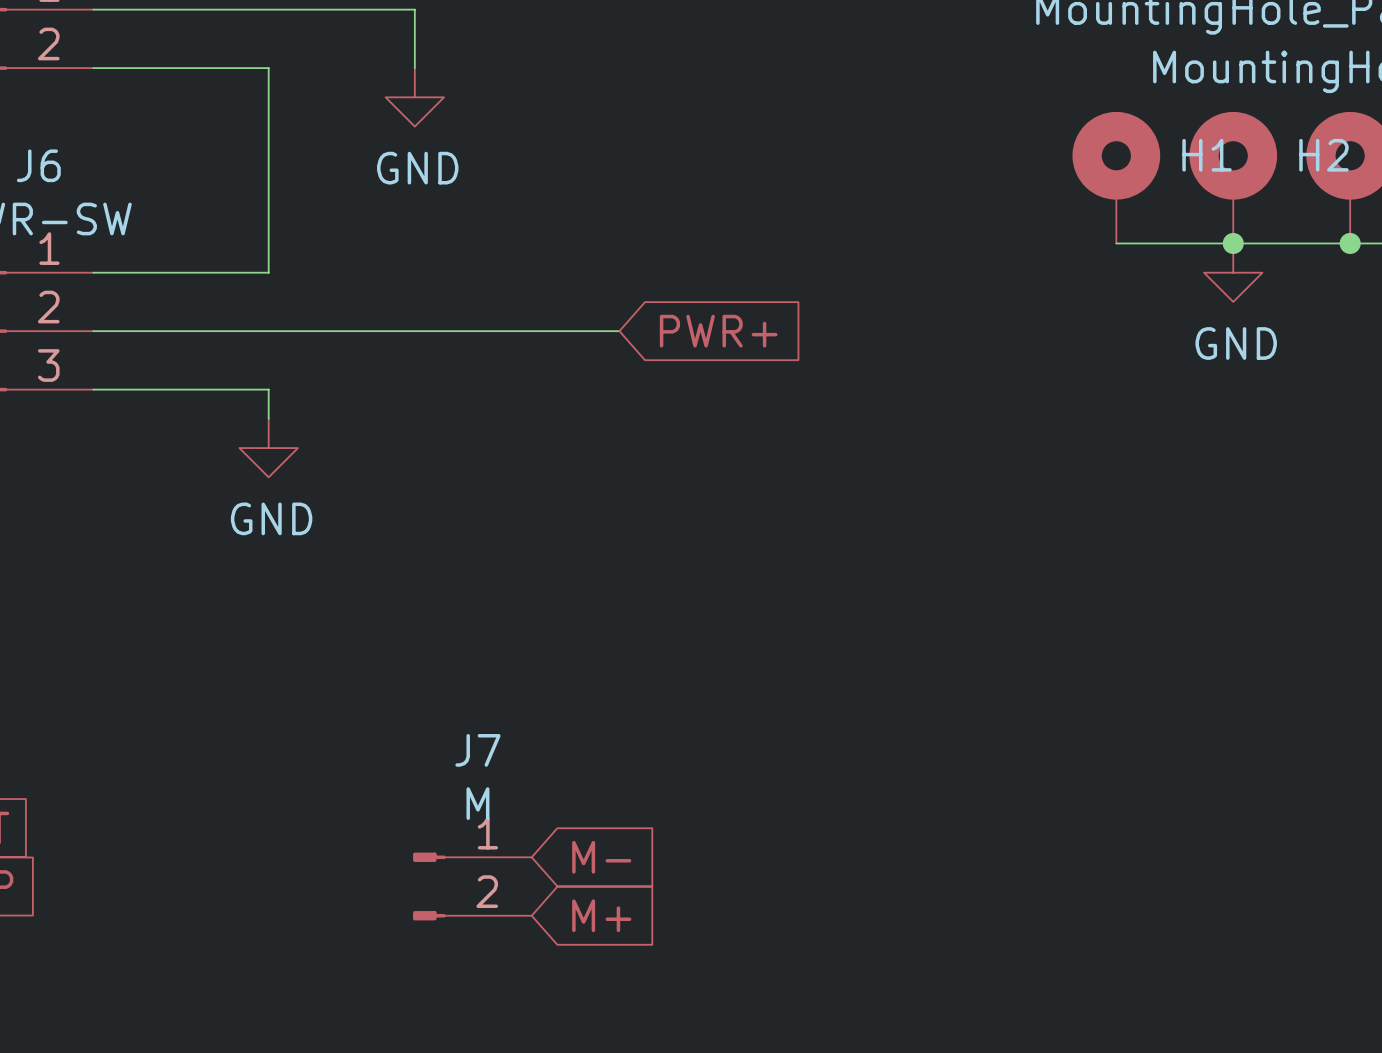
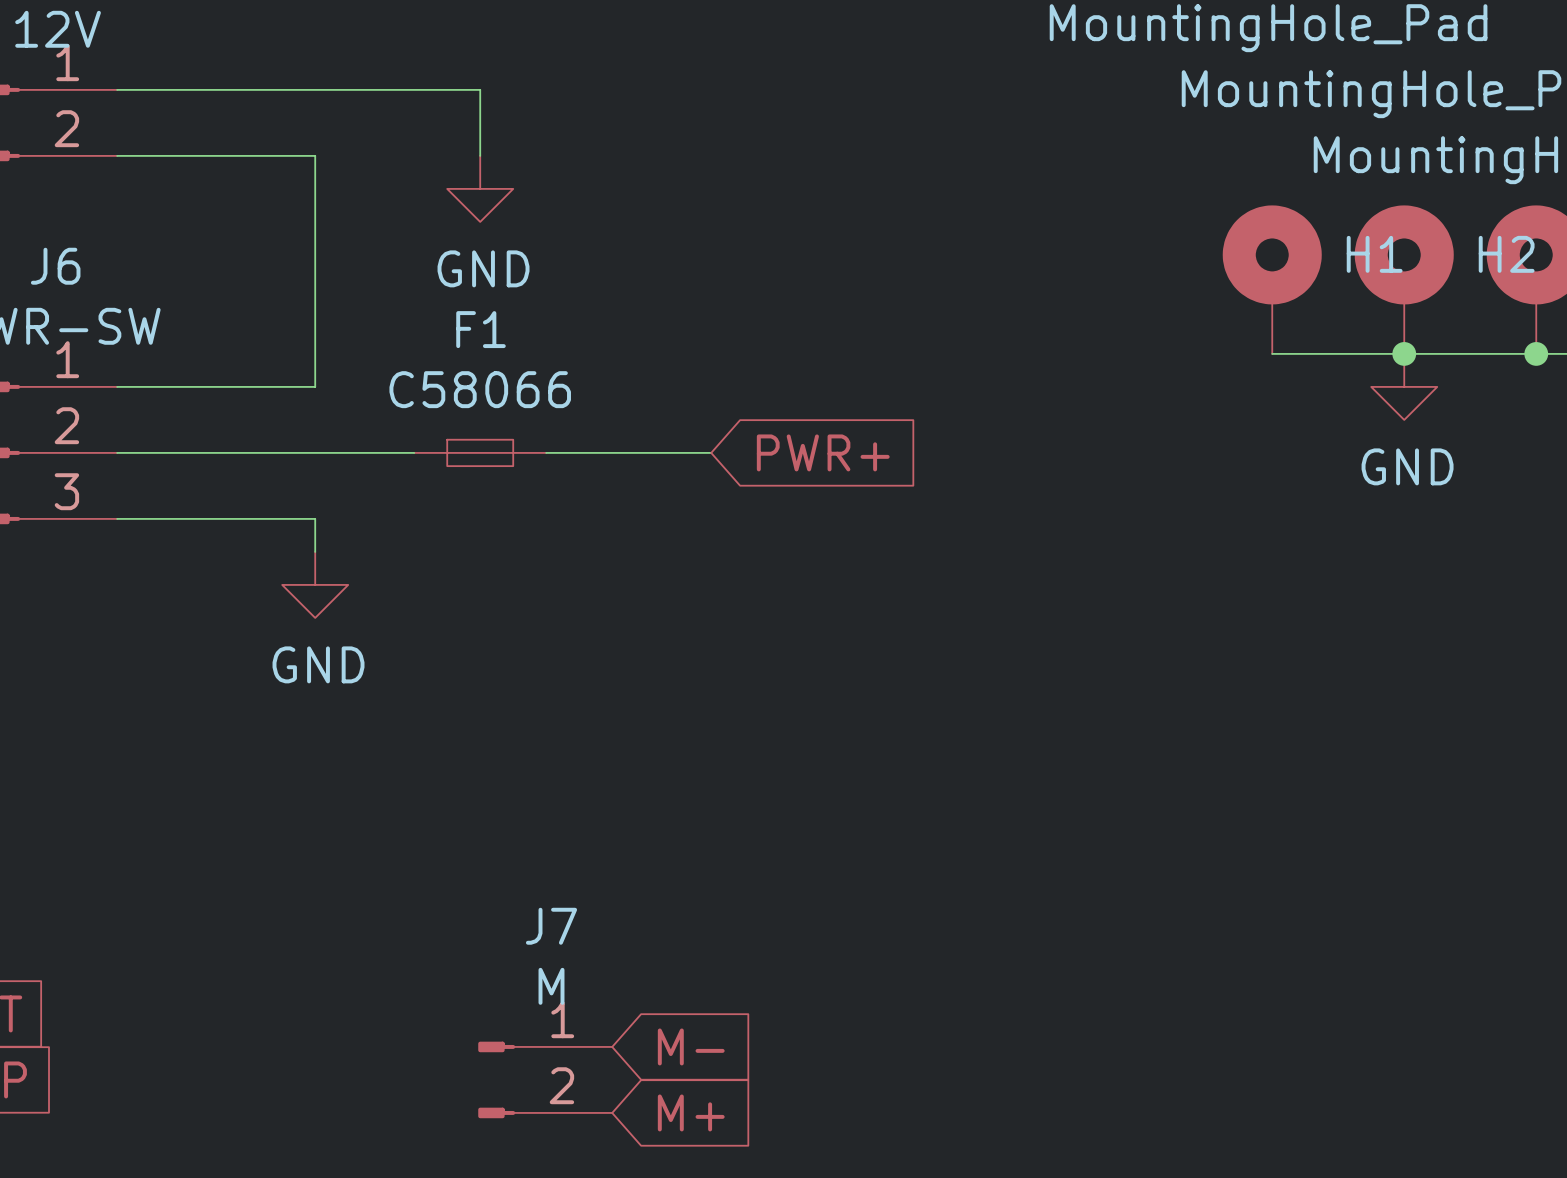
F1: none -> C58066 (480, 452)

